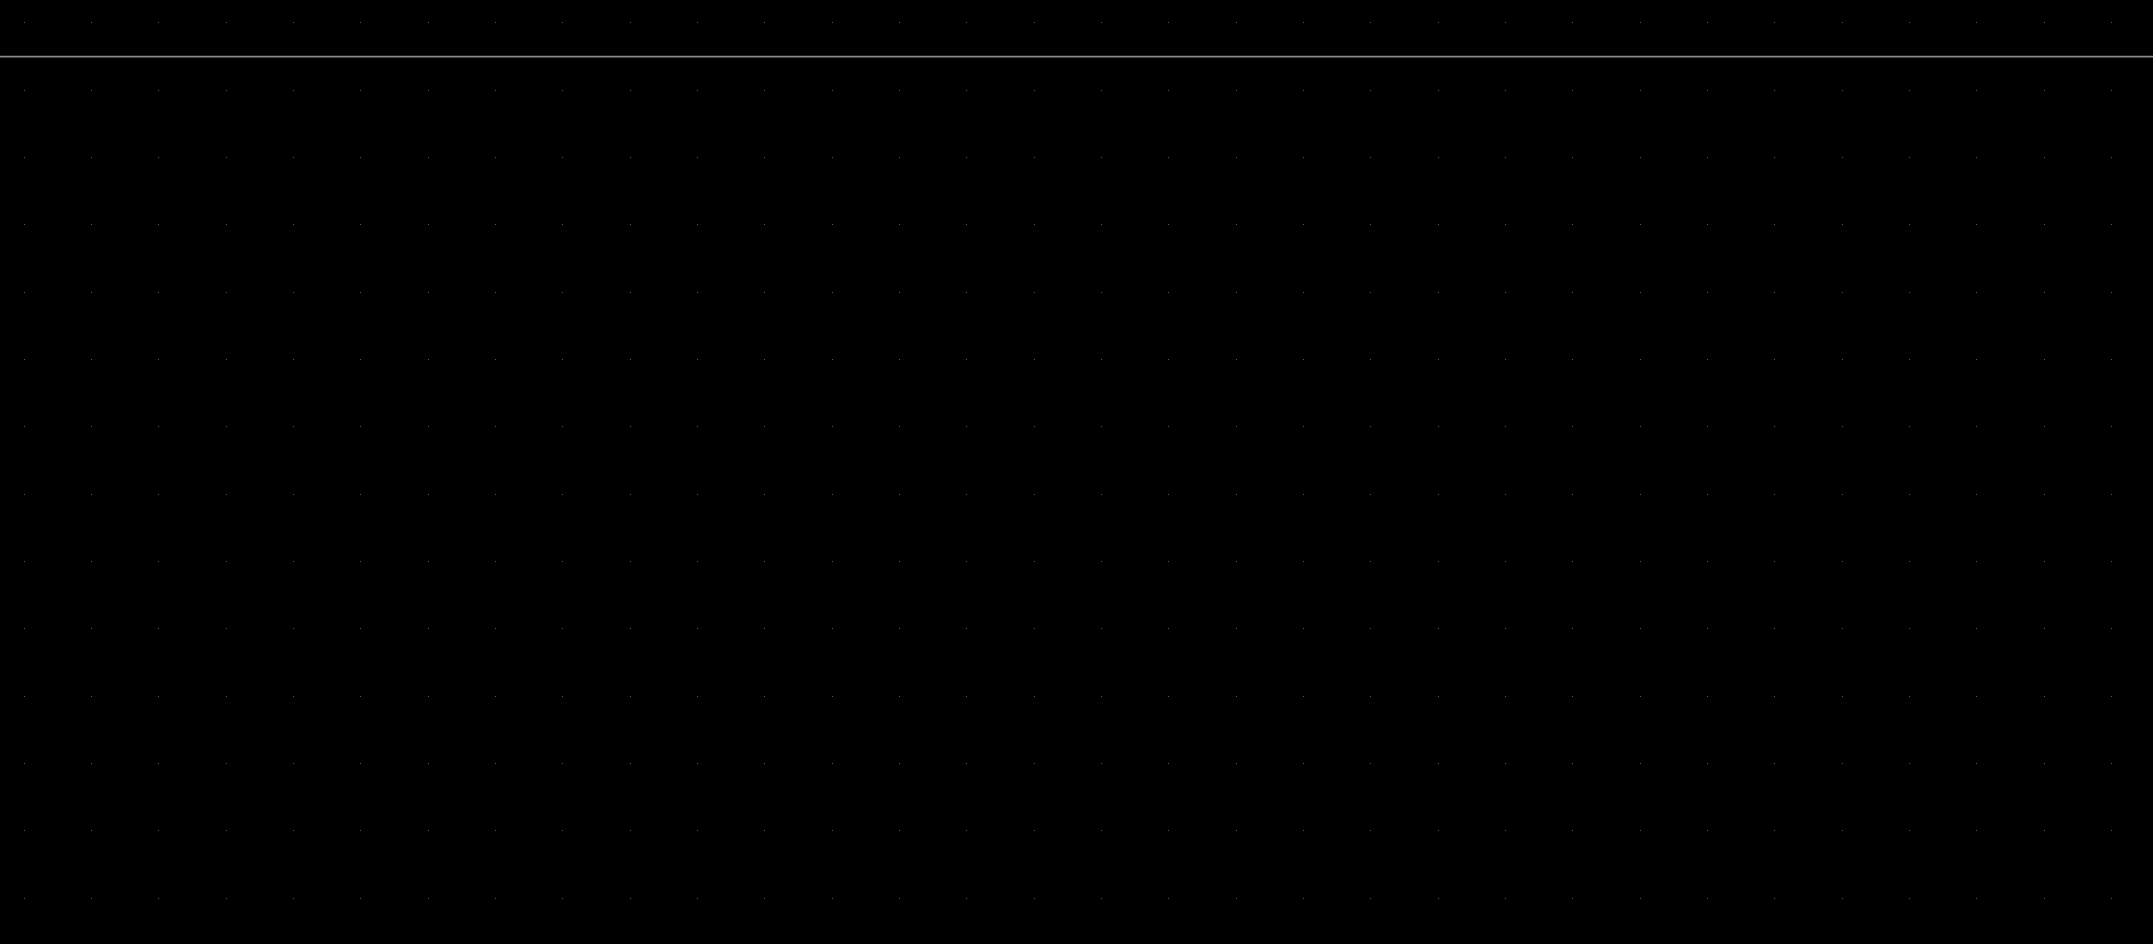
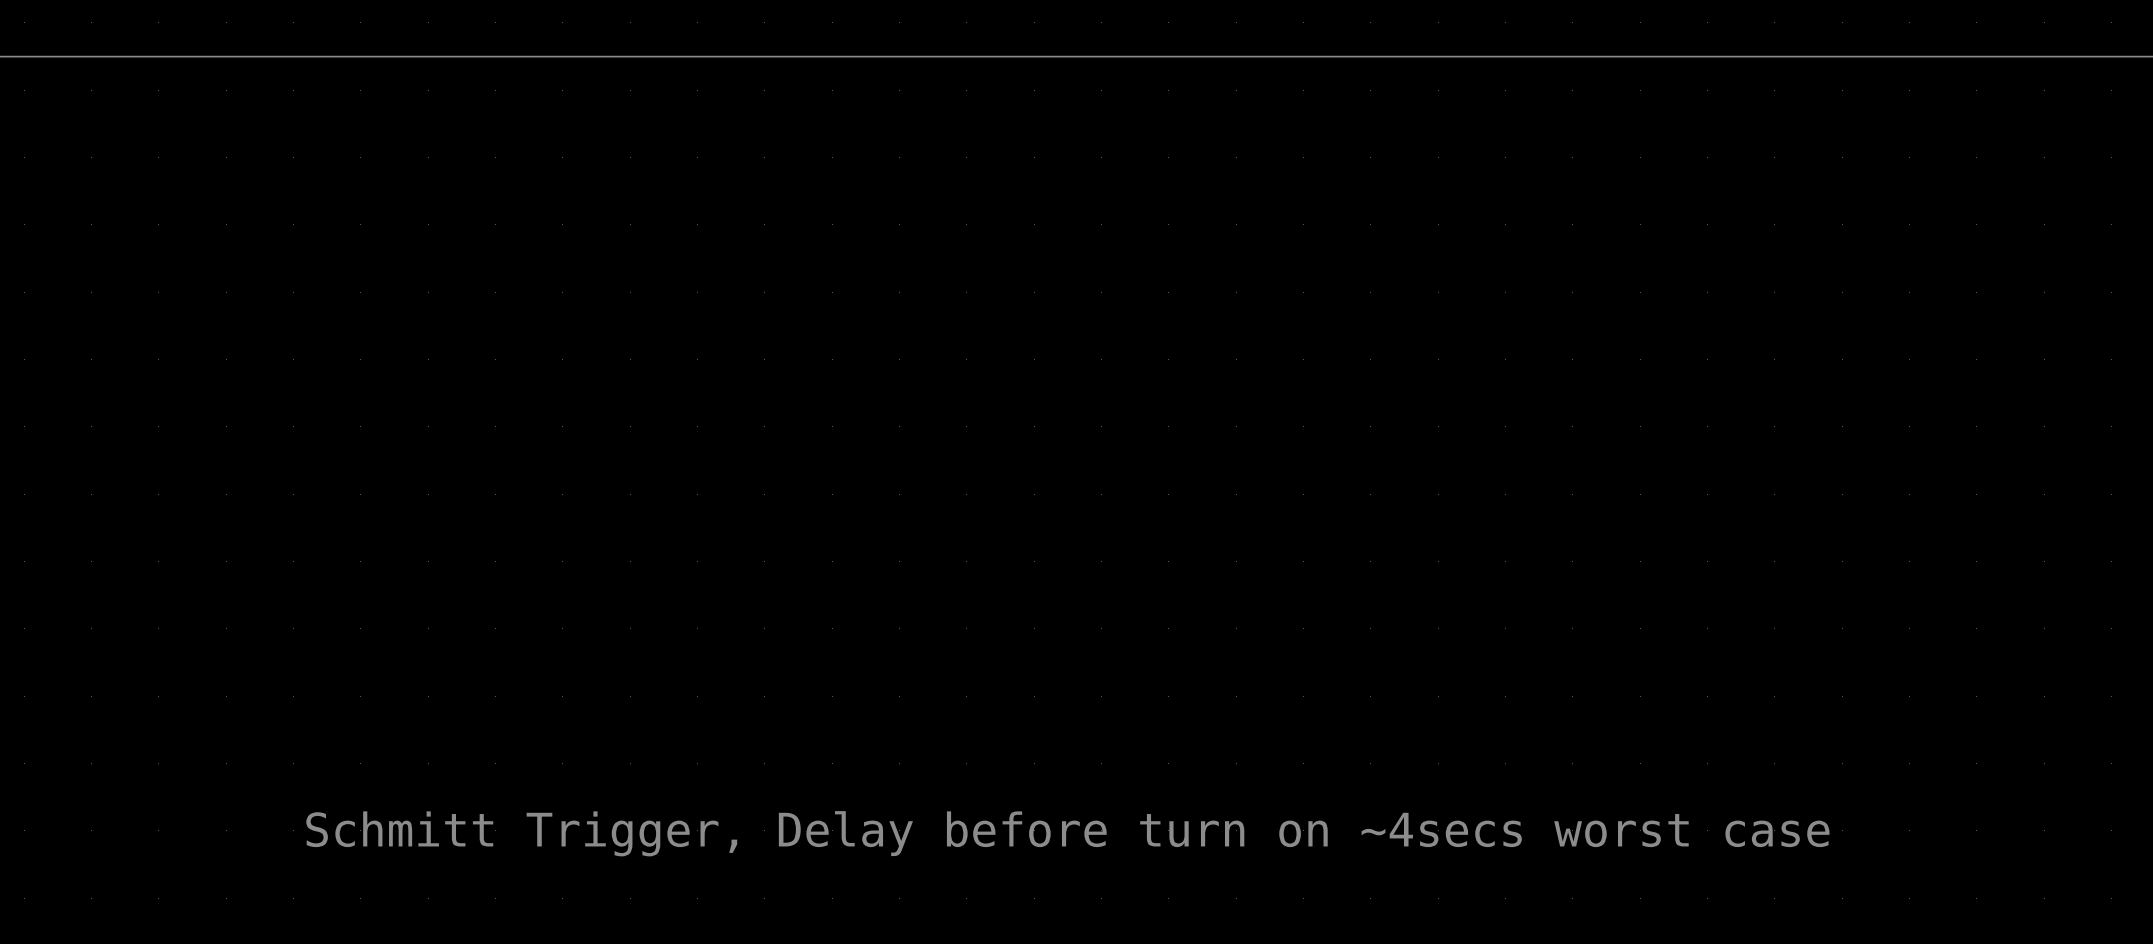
text: none -> Schmitt Trigger, Delay before turn on ~4secs worst case (1067, 833)

